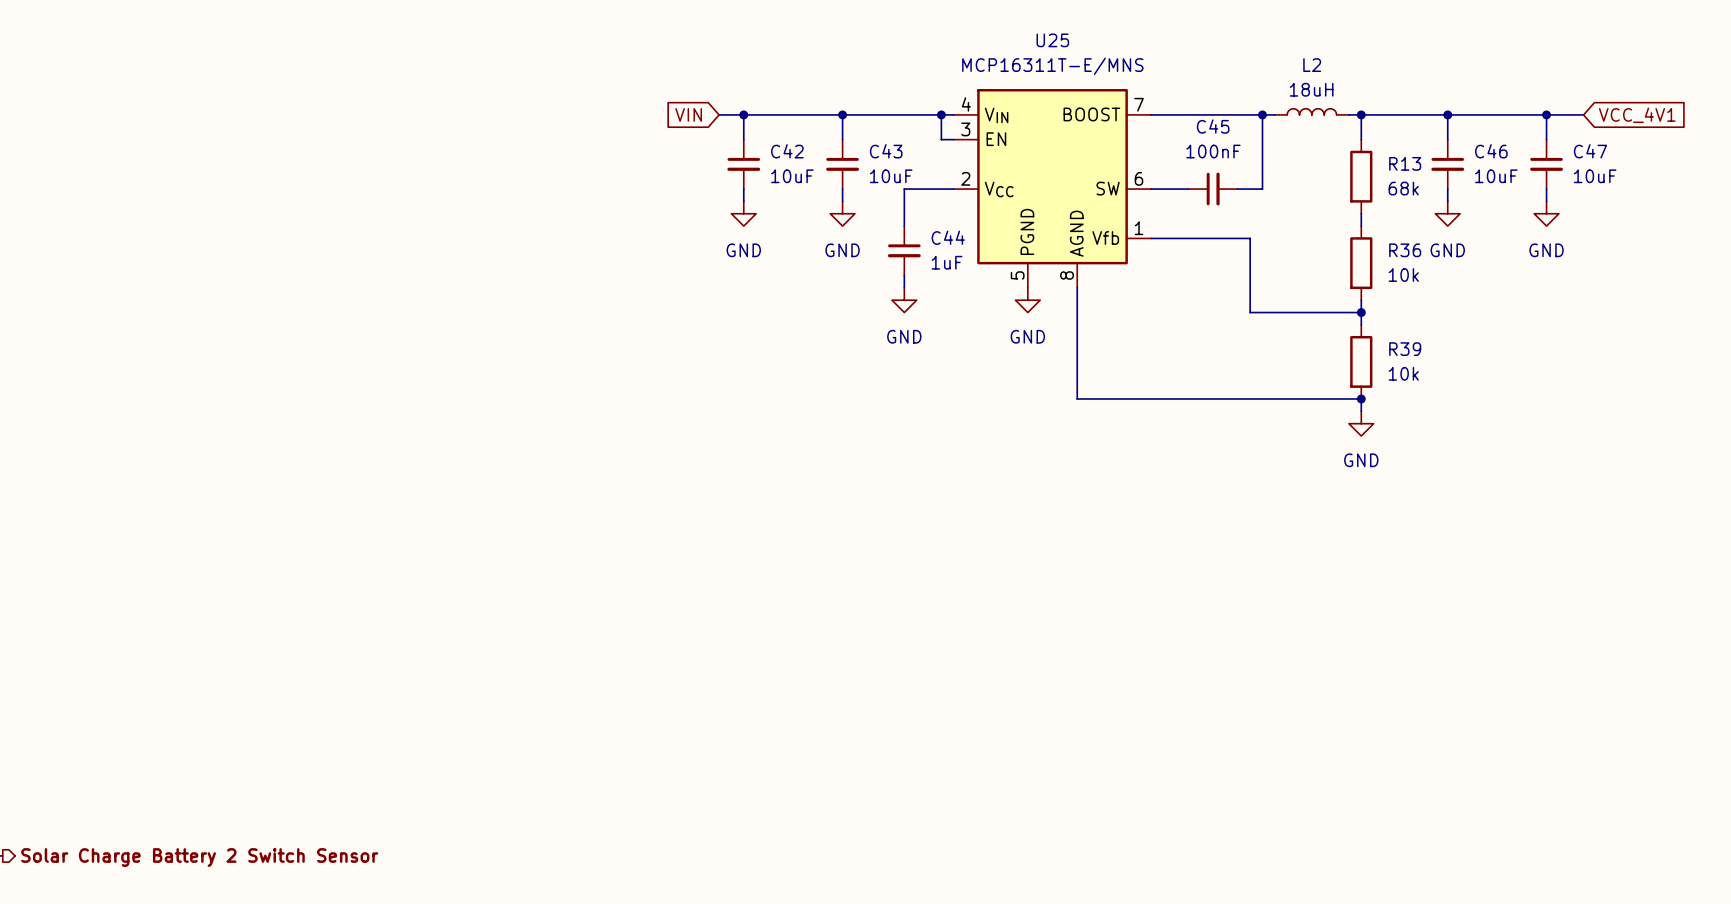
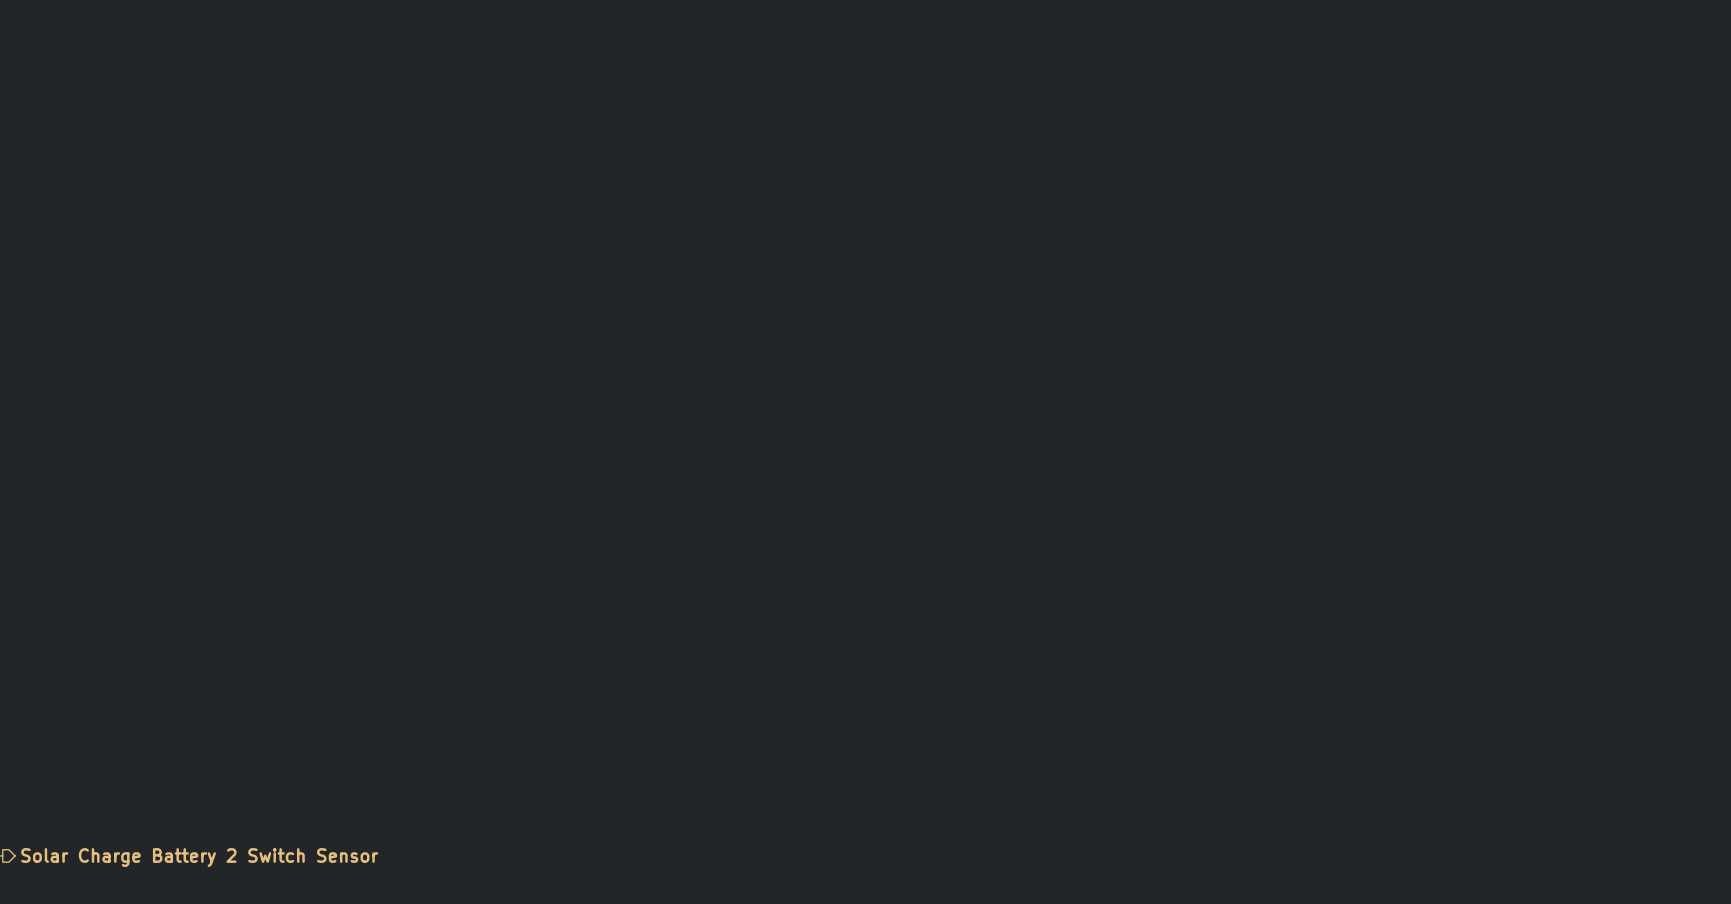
L2: 18uH (1311, 111) -> none
global label: VIN (688, 114) -> none
wire: (719, 114) (953, 114) -> none
wire: (743, 114) (743, 139) -> none
junction: (743, 114) -> none
wire: (842, 114) (842, 139) -> none
junction: (842, 114) -> none
wire: (941, 114) (941, 139) (953, 139) -> none
junction: (941, 114) -> none
wire: (1151, 114) (1274, 114) -> none
wire: (1262, 114) (1262, 189) (1237, 189) -> none
junction: (1262, 114) -> none
wire: (1348, 114) (1583, 114) -> none
wire: (1361, 114) (1361, 139) -> none
junction: (1361, 114) -> none
wire: (1447, 114) (1447, 139) -> none
junction: (1447, 114) -> none
wire: (1546, 114) (1546, 139) -> none
junction: (1546, 114) -> none
global label: VCC_4V1 (1637, 115) -> none
C42: 10uF (743, 164) -> none
C43: 10uF (842, 164) -> none
C46: 10uF (1447, 164) -> none
C47: 10uF (1546, 164) -> none
R13: 68k (1361, 176) -> none
U25: MCP16311T-E/MNS (1052, 188) -> none
wire: (743, 189) (743, 201) -> none
wire: (842, 189) (842, 201) -> none
wire: (953, 189) (904, 189) (904, 226) -> none
wire: (1151, 189) (1188, 189) -> none
C45: 100nF (1213, 189) -> none
wire: (1447, 189) (1447, 201) -> none
wire: (1546, 189) (1546, 201) -> none
power symbol: GND (743, 213) -> none
power symbol: GND (842, 213) -> none
wire: (1361, 213) (1361, 226) -> none
power symbol: GND (1447, 213) -> none
power symbol: GND (1546, 213) -> none
wire: (1151, 238) (1250, 238) (1250, 312) (1361, 312) -> none
C44: 1uF (904, 250) -> none
R36: 10k (1361, 263) -> none
wire: (904, 275) (904, 287) -> none
wire: (1077, 287) (1077, 398) (1361, 398) (1361, 411) -> none
power symbol: GND (904, 300) -> none
power symbol: GND (1027, 300) -> none
wire: (1361, 300) (1361, 324) -> none
junction: (1361, 312) -> none
R39: 10k (1361, 361) -> none
junction: (1361, 398) -> none
power symbol: GND (1361, 423) -> none

